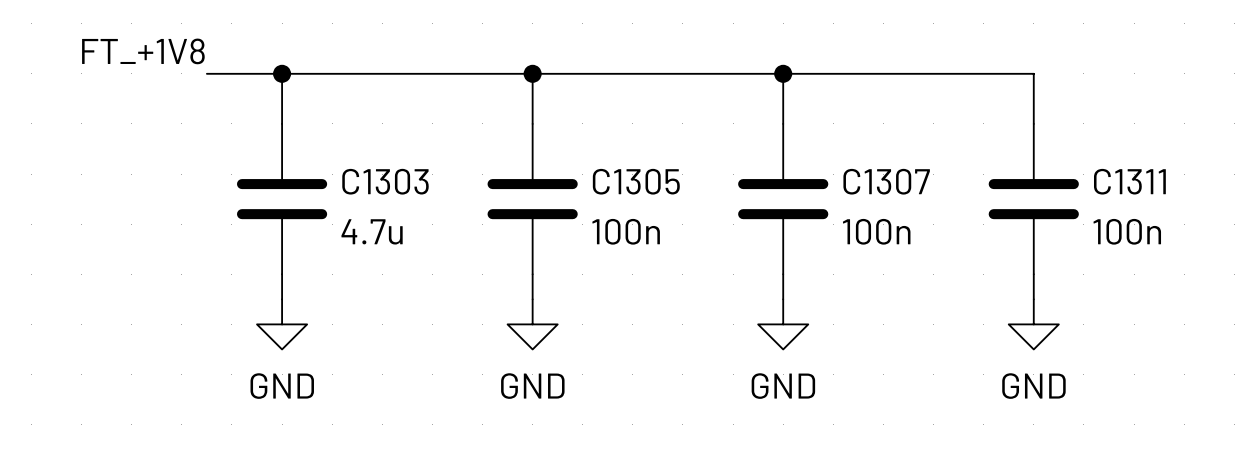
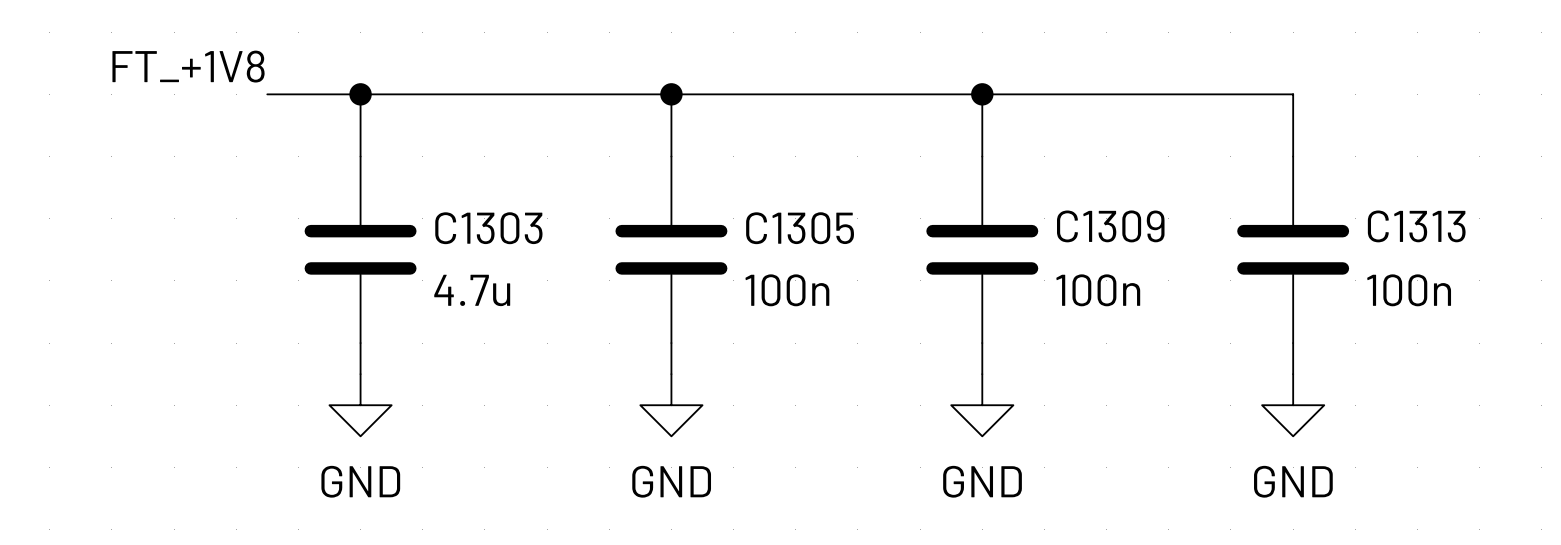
C1307 name: C1307 (886, 181) -> C1309 (1110, 226)
C1311 name: C1311 (1129, 181) -> C1313 (1416, 226)

